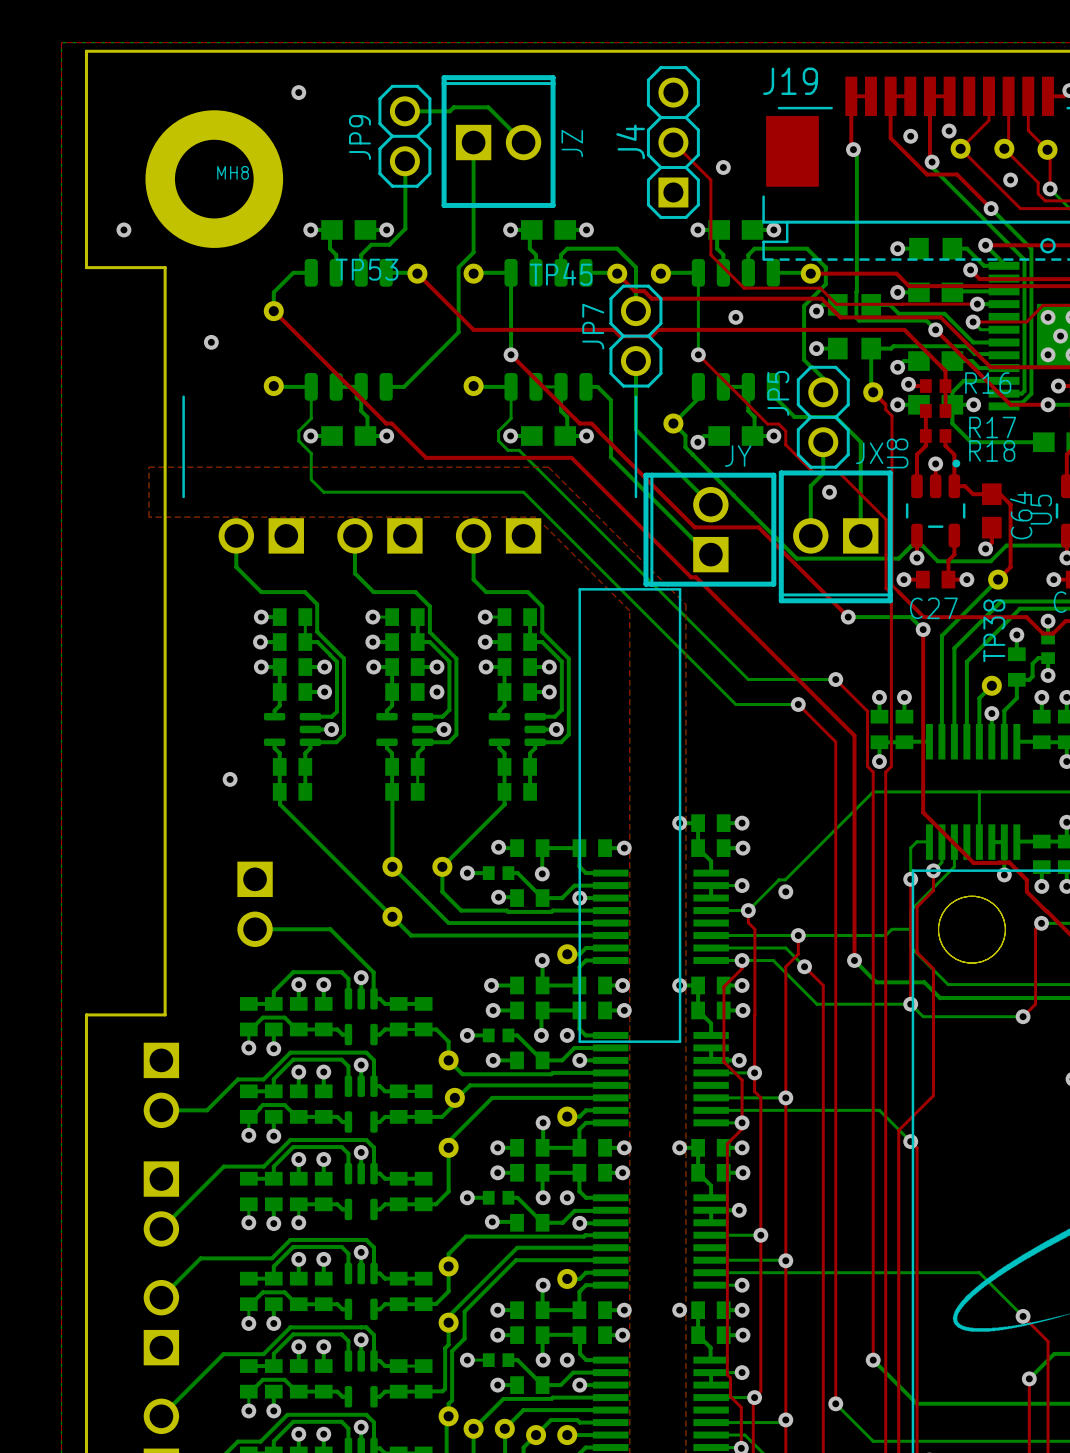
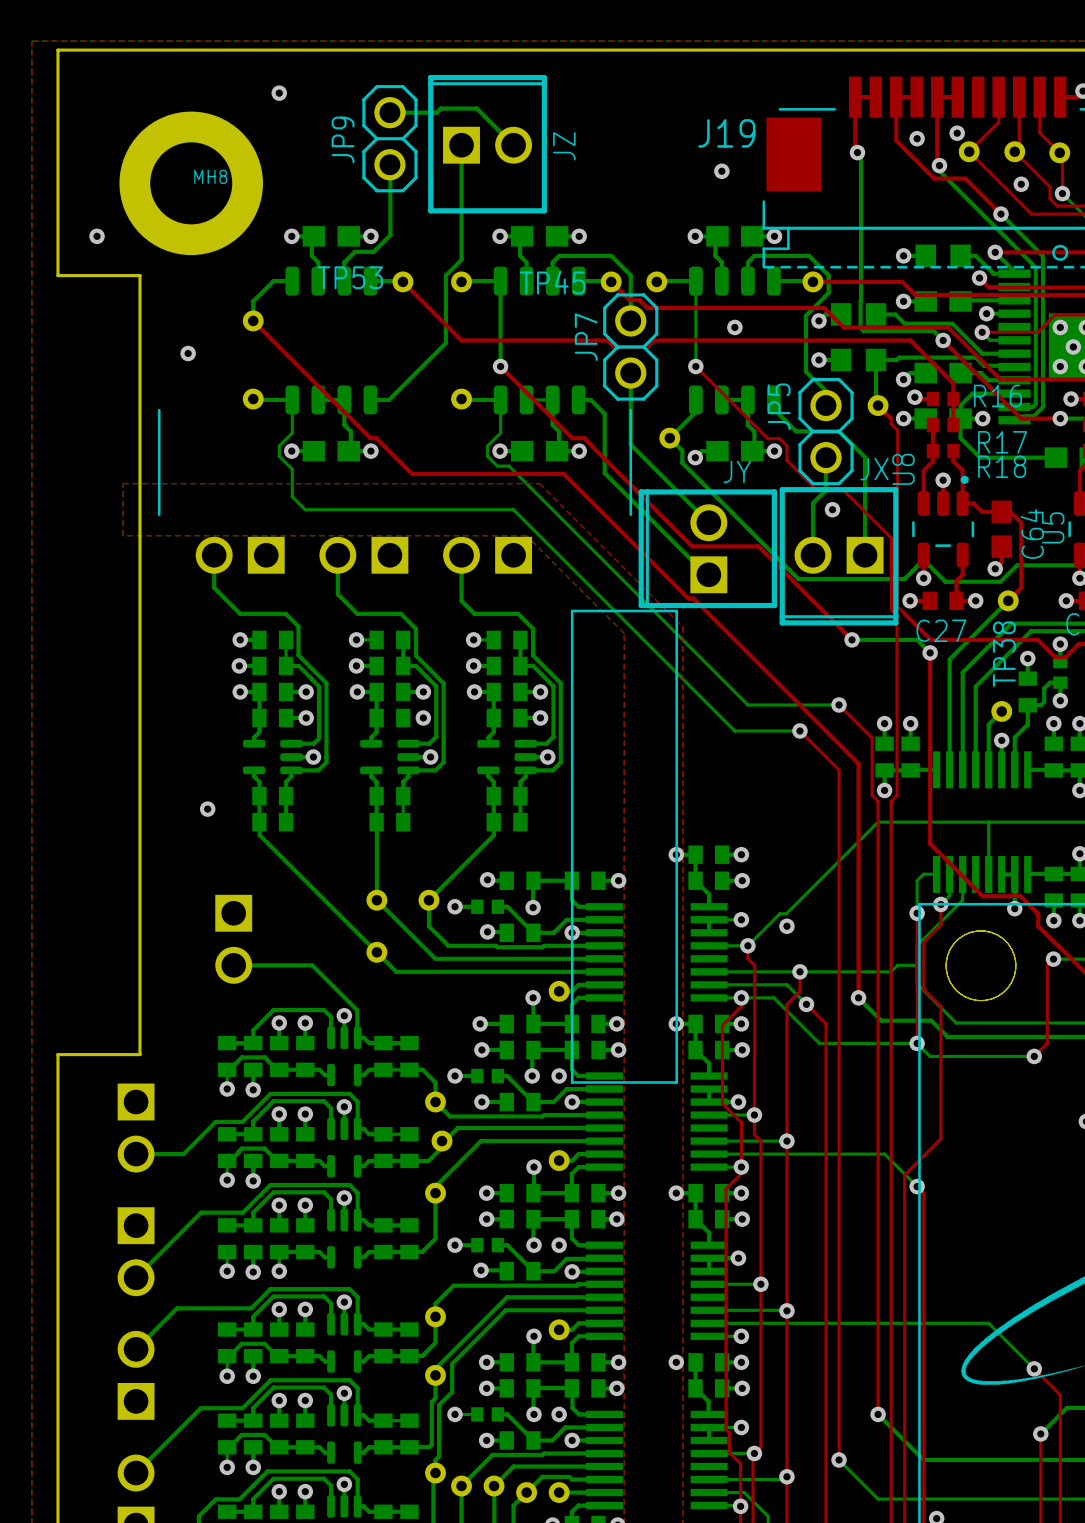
J19 name position: J19 (790, 81) -> J19 (726, 133)
top track: (673, 142) (710, 179) (710, 254) (744, 288) (820, 288) (836, 304) (902, 304) -> none
J4: (673, 142) -> none
top track: (902, 304) (977, 304) -> none

